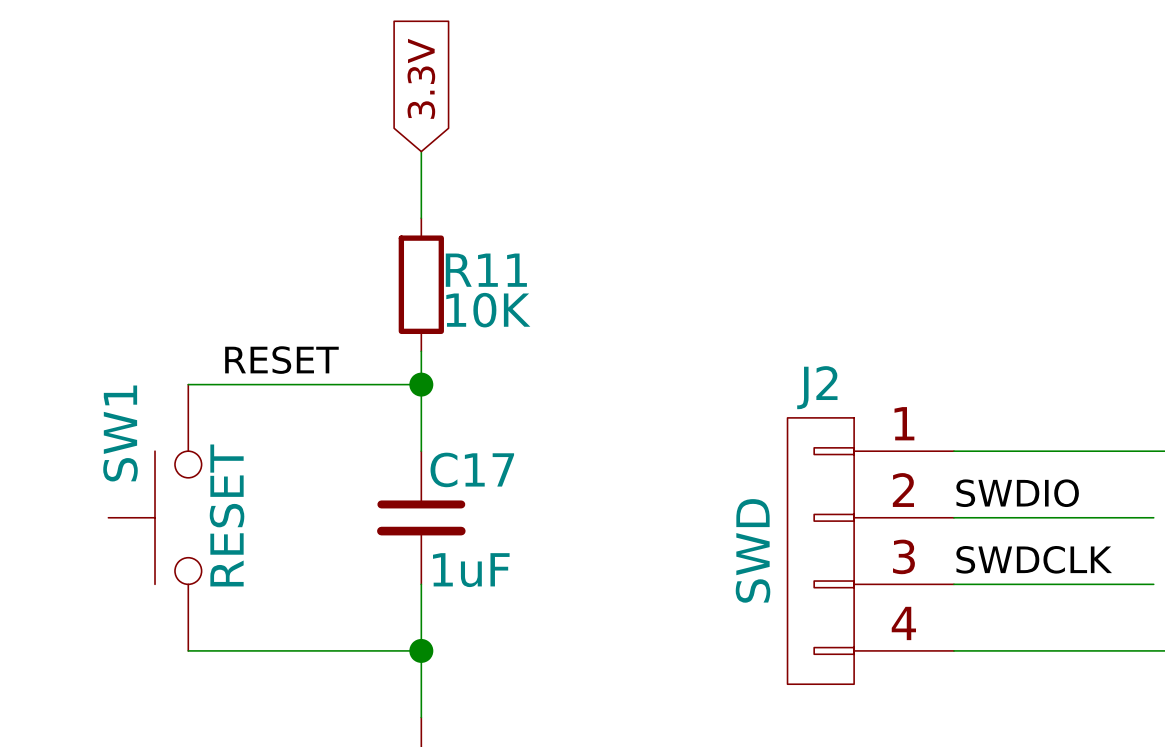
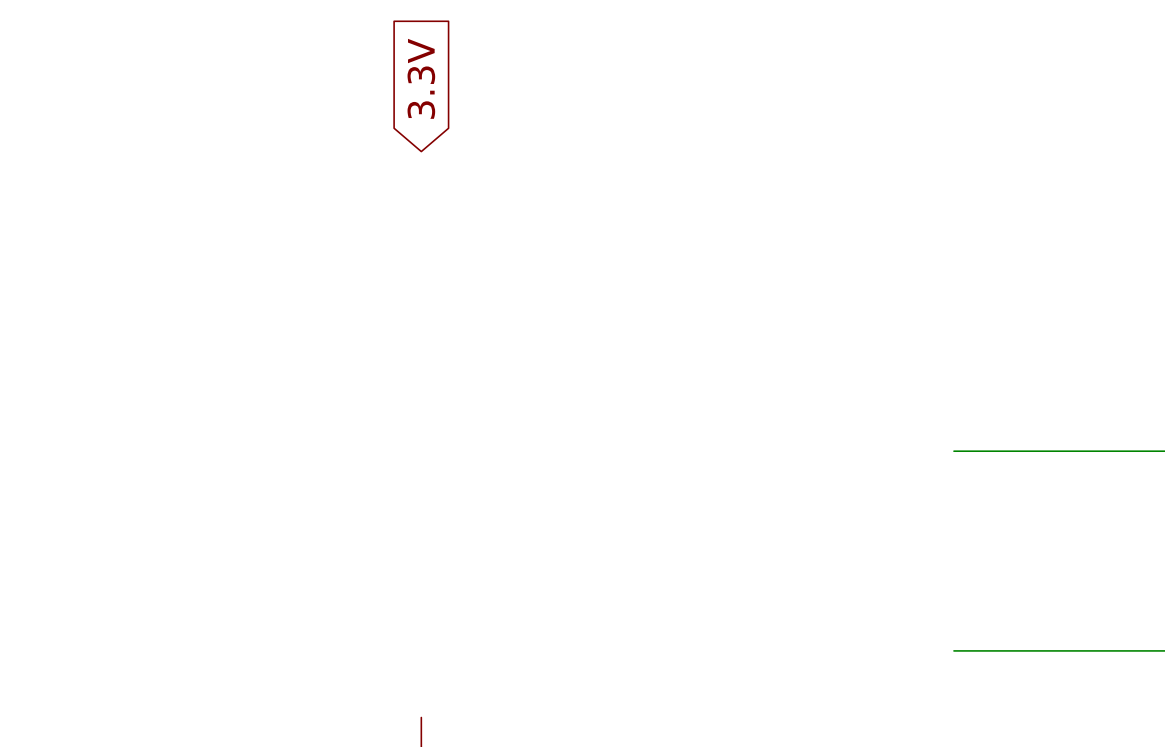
wire: (421, 151) (421, 218) -> none
R11: 10K (421, 284) -> none
wire: (421, 351) (421, 451) -> none
label: RESET (281, 360) -> none
wire: (188, 384) (421, 384) -> none
junction: (421, 384) -> none
label: SWDIO (1017, 493) -> none
SW1: RESET (155, 517) -> none
C17: 1uF (421, 517) -> none
wire: (953, 517) (1153, 517) -> none
J2: SWD (870, 551) -> none
label: SWDCLK (1034, 559) -> none
wire: (421, 584) (421, 717) -> none
wire: (953, 584) (1153, 584) -> none
wire: (188, 650) (421, 650) -> none
junction: (421, 650) -> none

